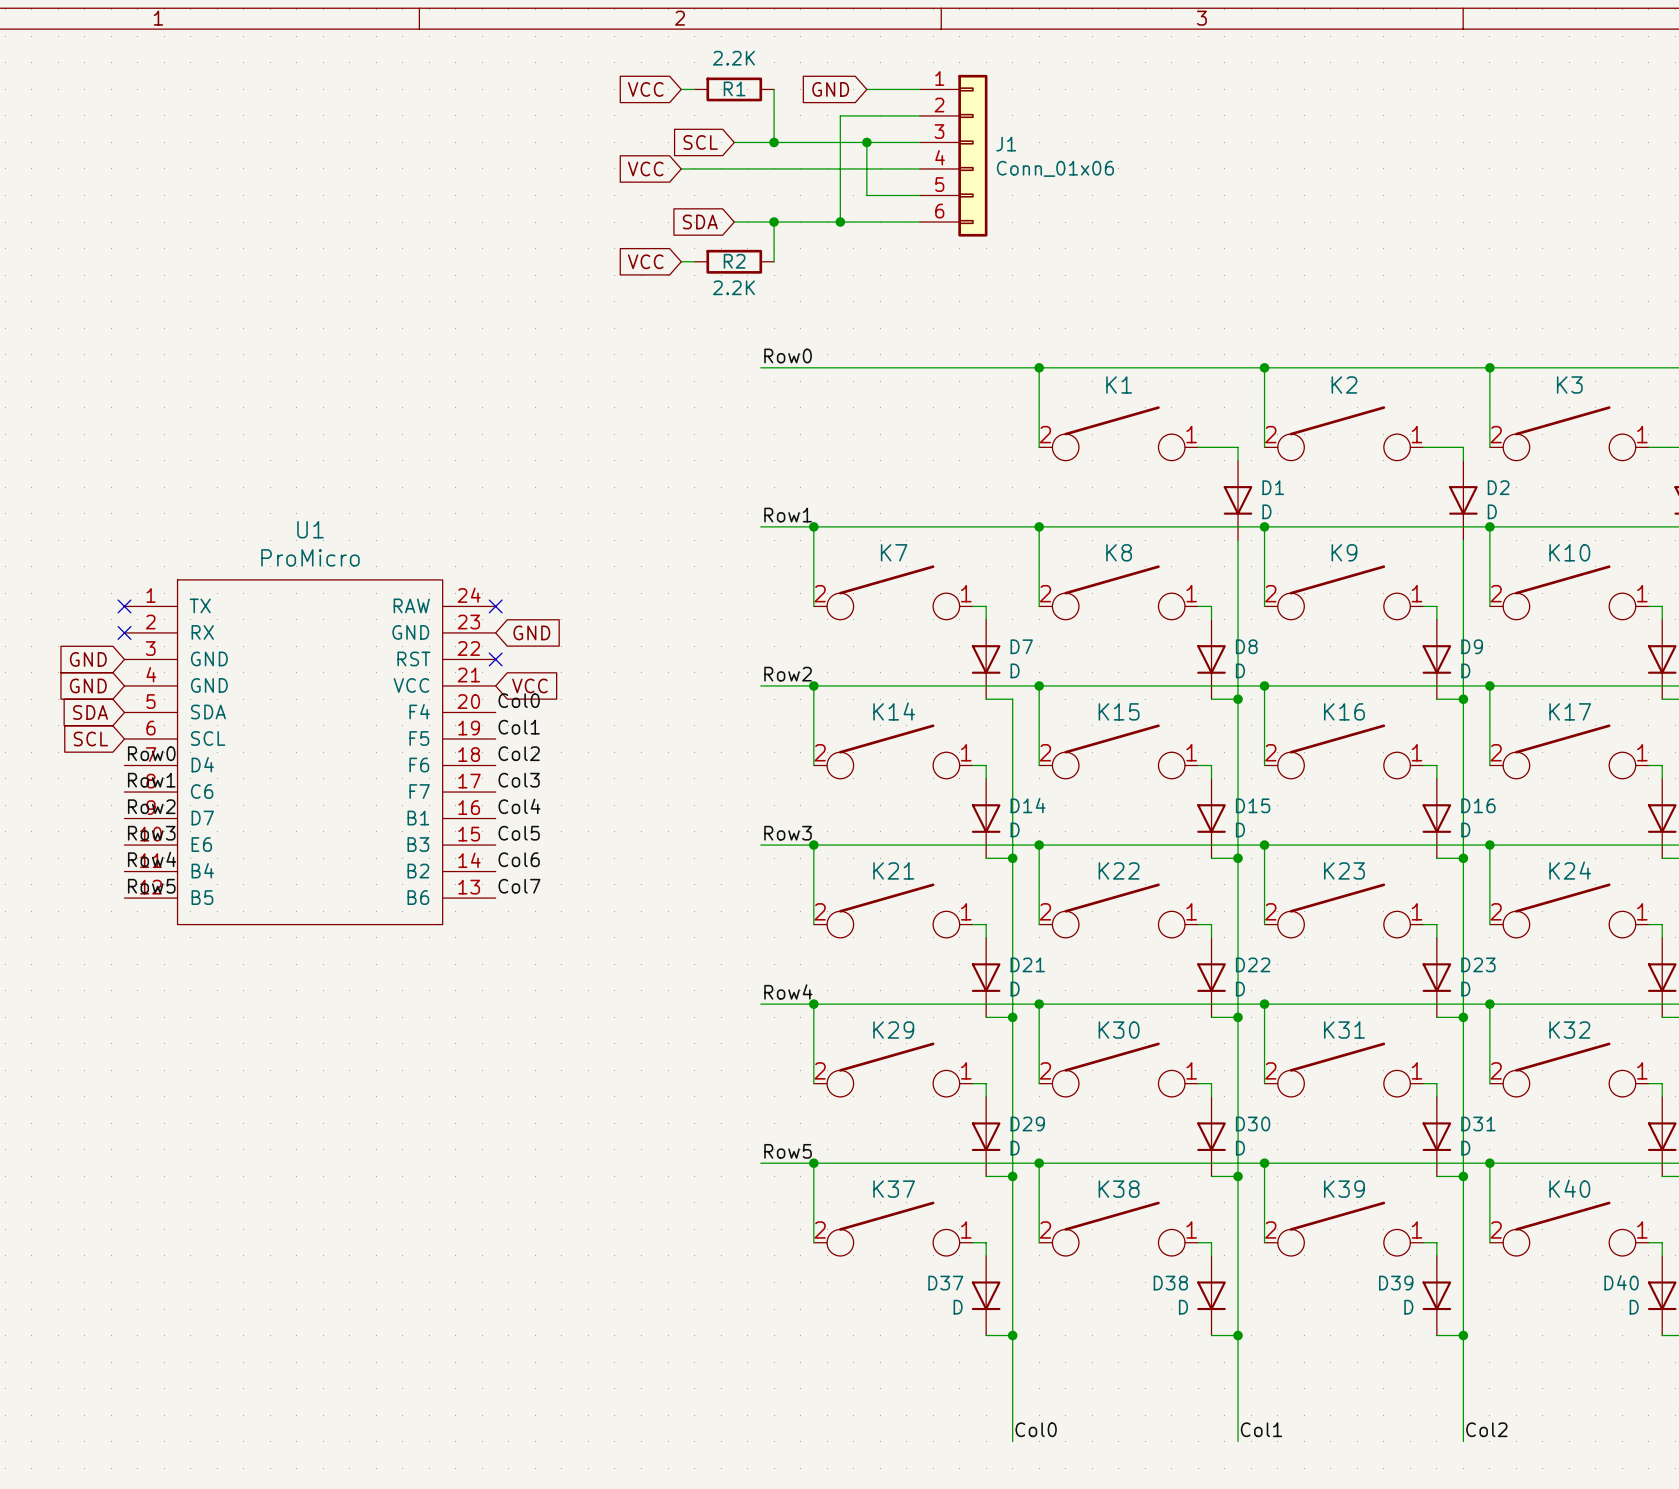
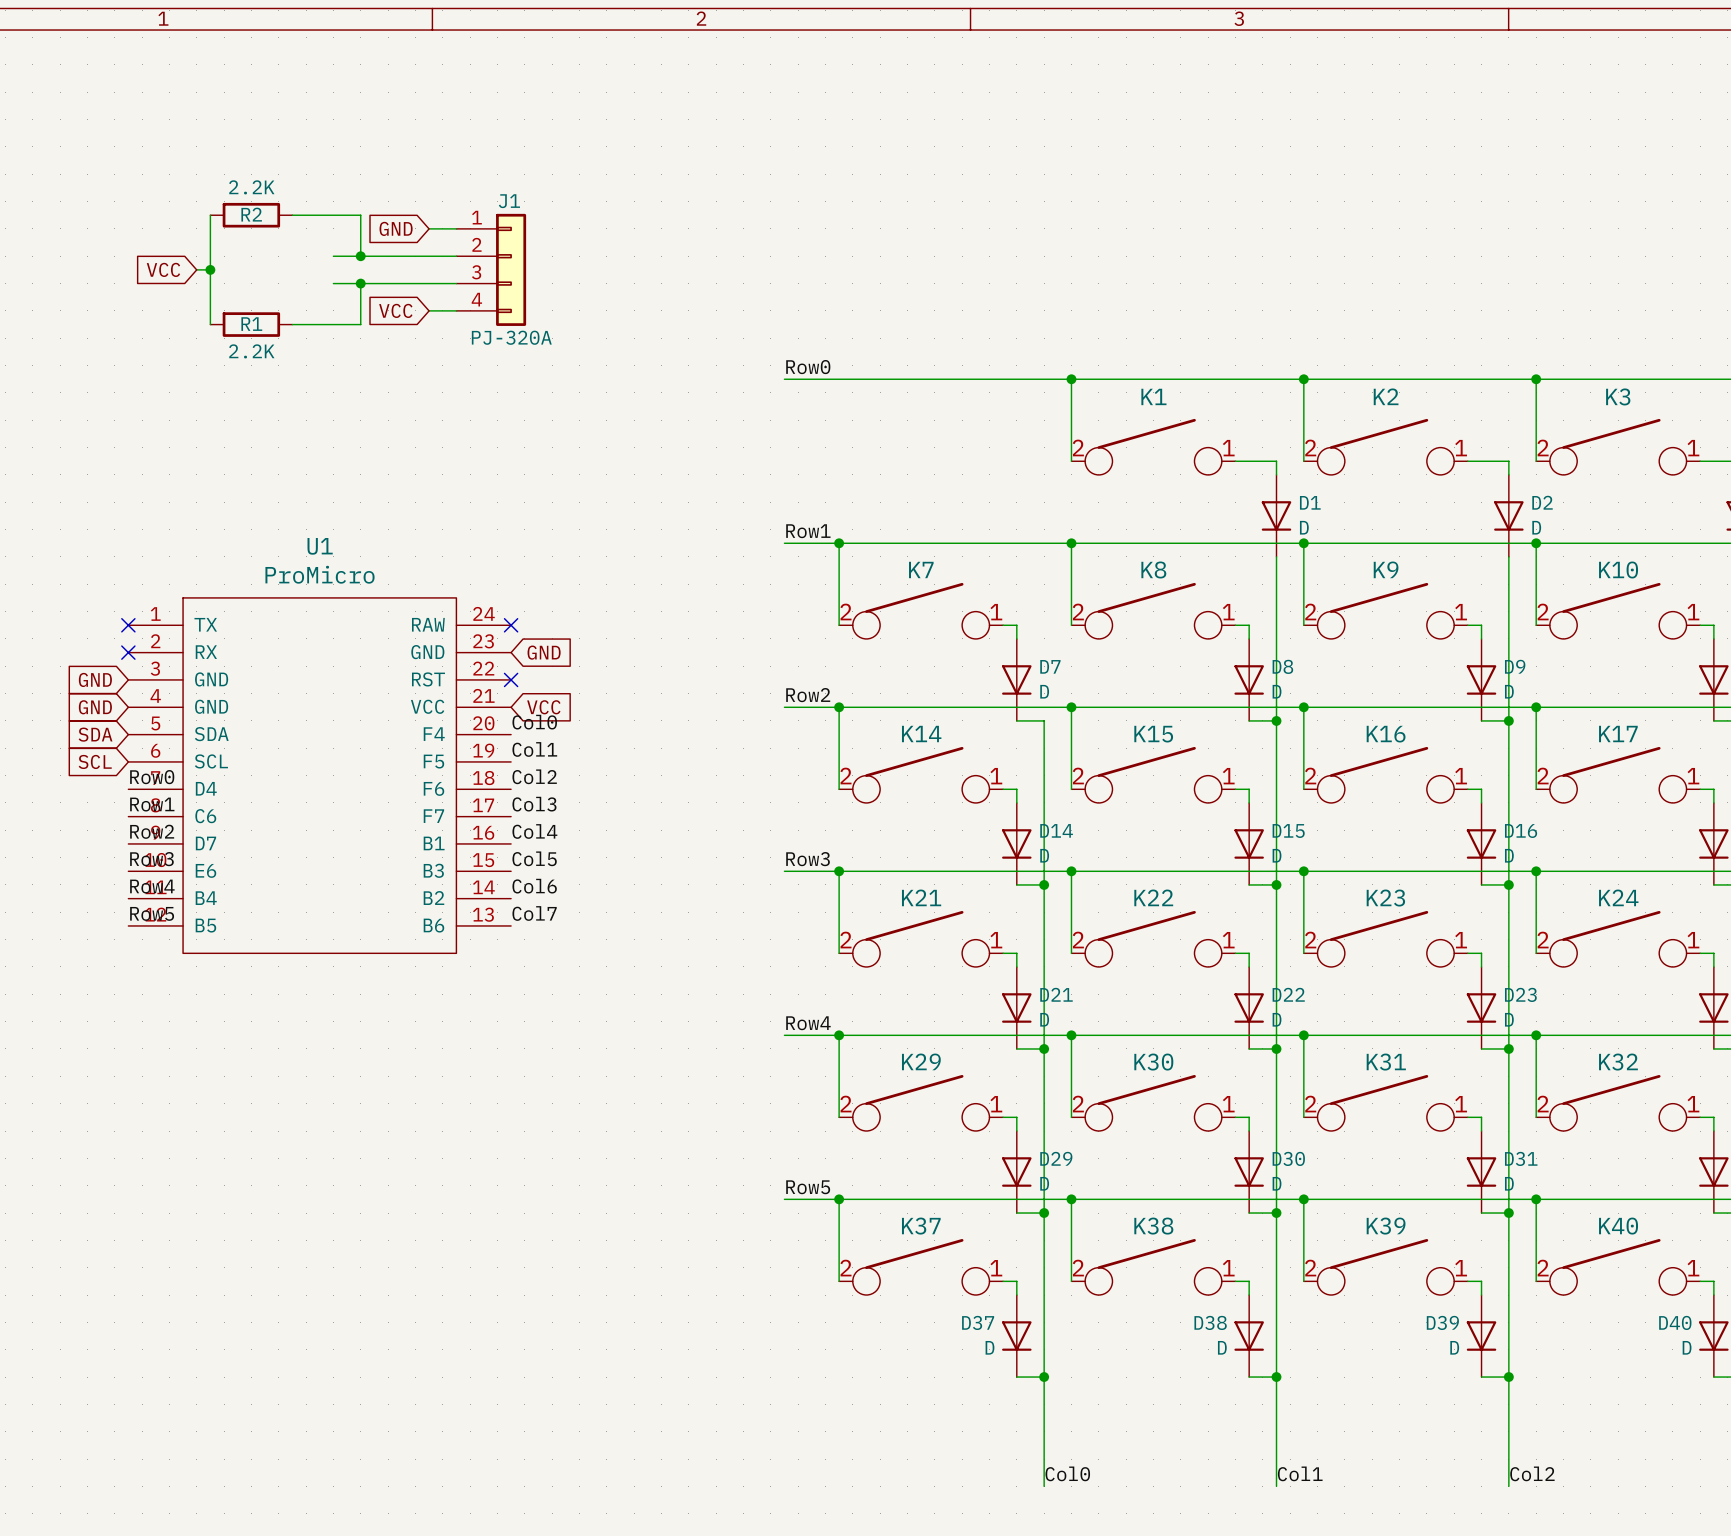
R1 value position: 2.2K (733, 58) -> 2.2K (251, 351)
J1 symbol: [919, 74, 988, 237] -> [456, 213, 527, 326]
global label: VCC (645, 89) -> none
wire: (681, 89) (694, 89) -> none
R1 position: (734, 89) -> (251, 324)
wire: (774, 89) (774, 142) -> none
global label: GND (830, 89) -> none
wire: (866, 89) (919, 89) -> none
wire: (919, 115) (840, 115) (840, 222) -> none
global label: SCL (700, 142) -> none
wire: (734, 142) (919, 142) -> none
junction: (774, 142) -> none
wire: (866, 142) (866, 195) (919, 195) -> none
junction: (866, 142) -> none
J1 name position: J1 (1006, 144) -> J1 (509, 201)
global label: VCC (645, 168) -> none
wire: (681, 168) (919, 168) -> none
J1 value: Conn_01x06 (1055, 168) -> PJ-320A (511, 337)
wire: none -> (210, 215) (210, 324)
wire: none -> (292, 215) (360, 215) (360, 256)
global label: none -> GND (396, 228)
wire: none -> (429, 228) (456, 228)
global label: SDA (700, 222) -> none
wire: (734, 222) (919, 222) -> none
wire: (774, 222) (774, 261) -> none
junction: (774, 222) -> none
junction: (840, 222) -> none
wire: none -> (333, 256) (456, 256)
junction: none -> (360, 256)
global label: none -> VCC (163, 269)
wire: none -> (196, 269) (210, 269)
junction: none -> (210, 269)
global label: VCC (645, 261) -> none
wire: (681, 261) (694, 261) -> none
R2 position: (734, 261) -> (251, 215)
wire: none -> (333, 283) (456, 283)
wire: none -> (360, 283) (360, 324) (292, 324)
junction: none -> (360, 283)
R2 value position: 2.2K (733, 287) -> 2.2K (251, 187)
global label: none -> VCC (395, 310)
wire: none -> (429, 310) (456, 310)

